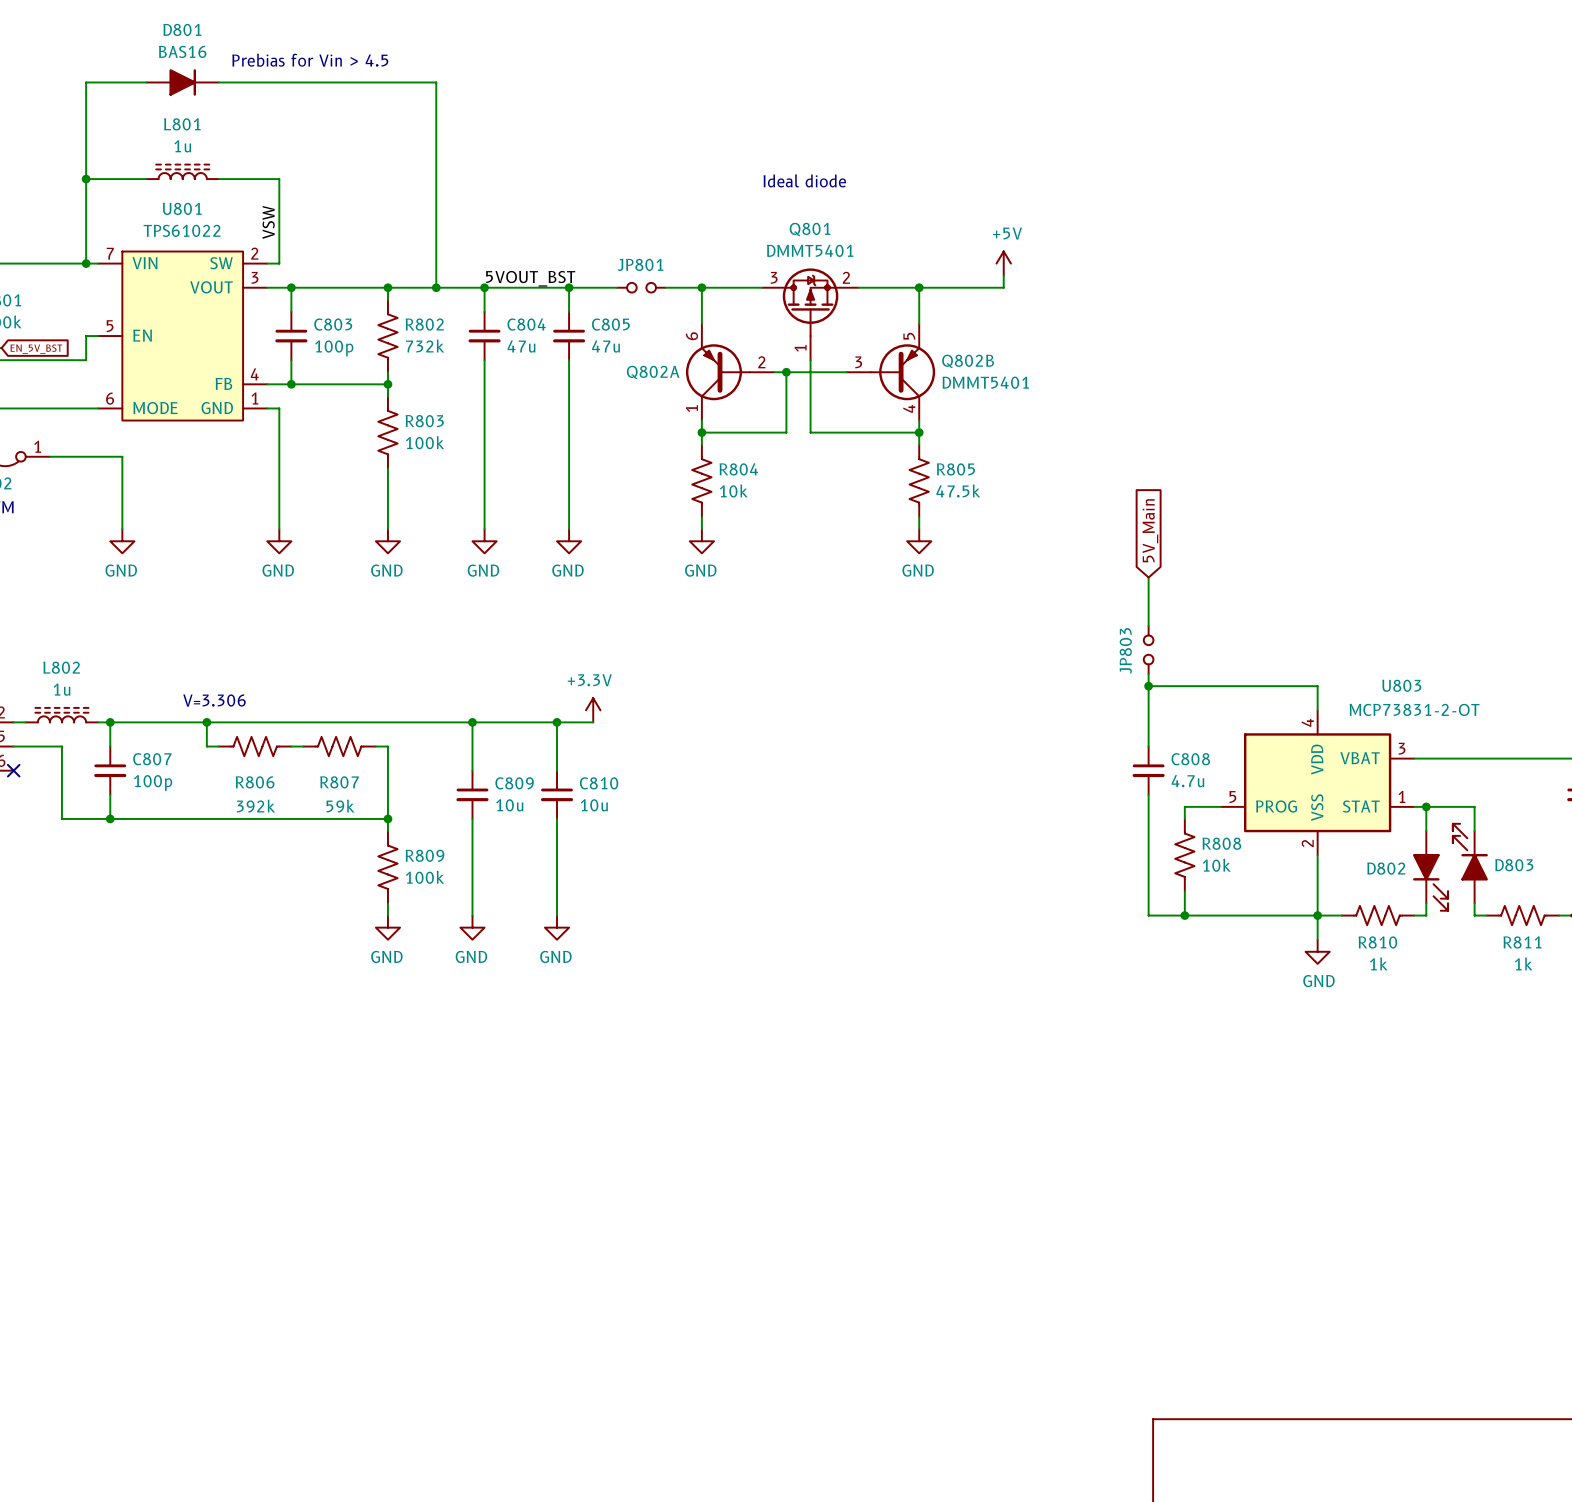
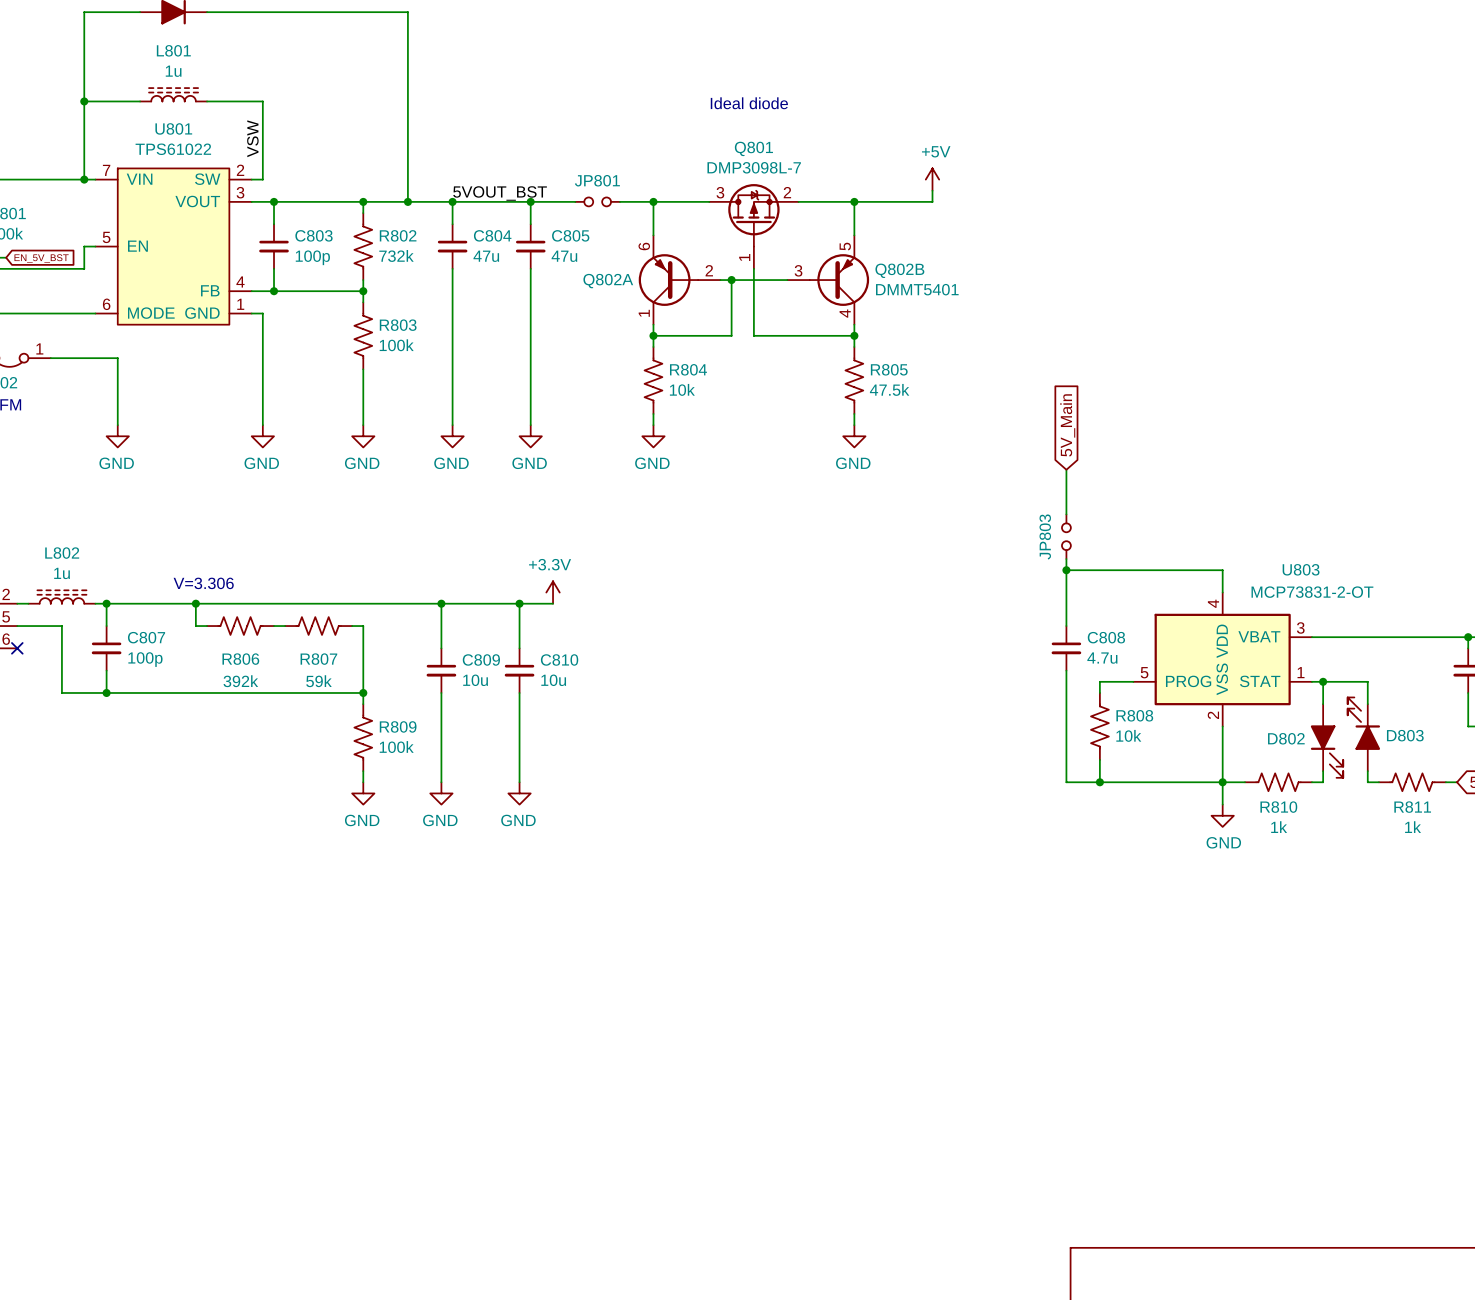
Q801 value: DMMT5401 (810, 250) -> DMP3098L-7 (754, 167)

